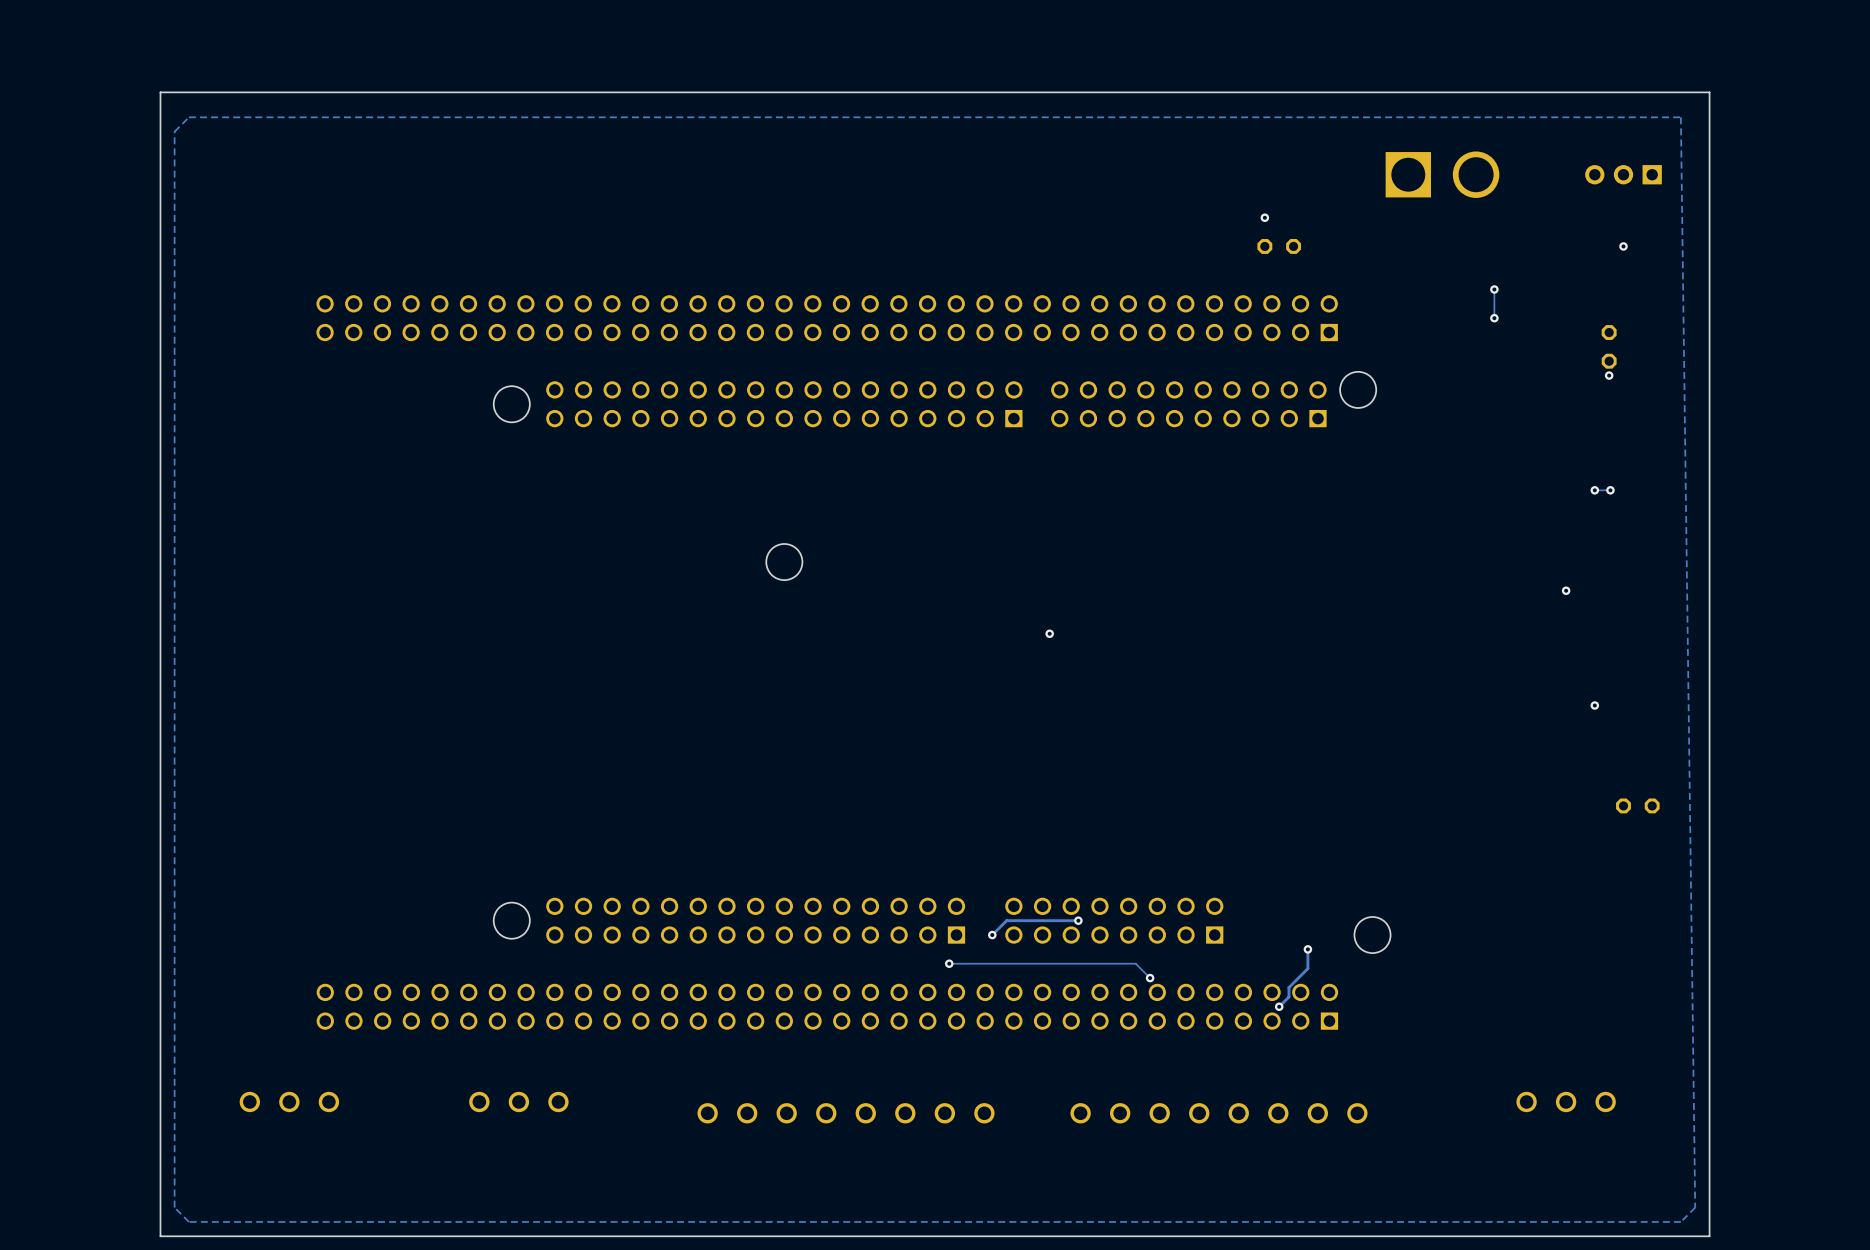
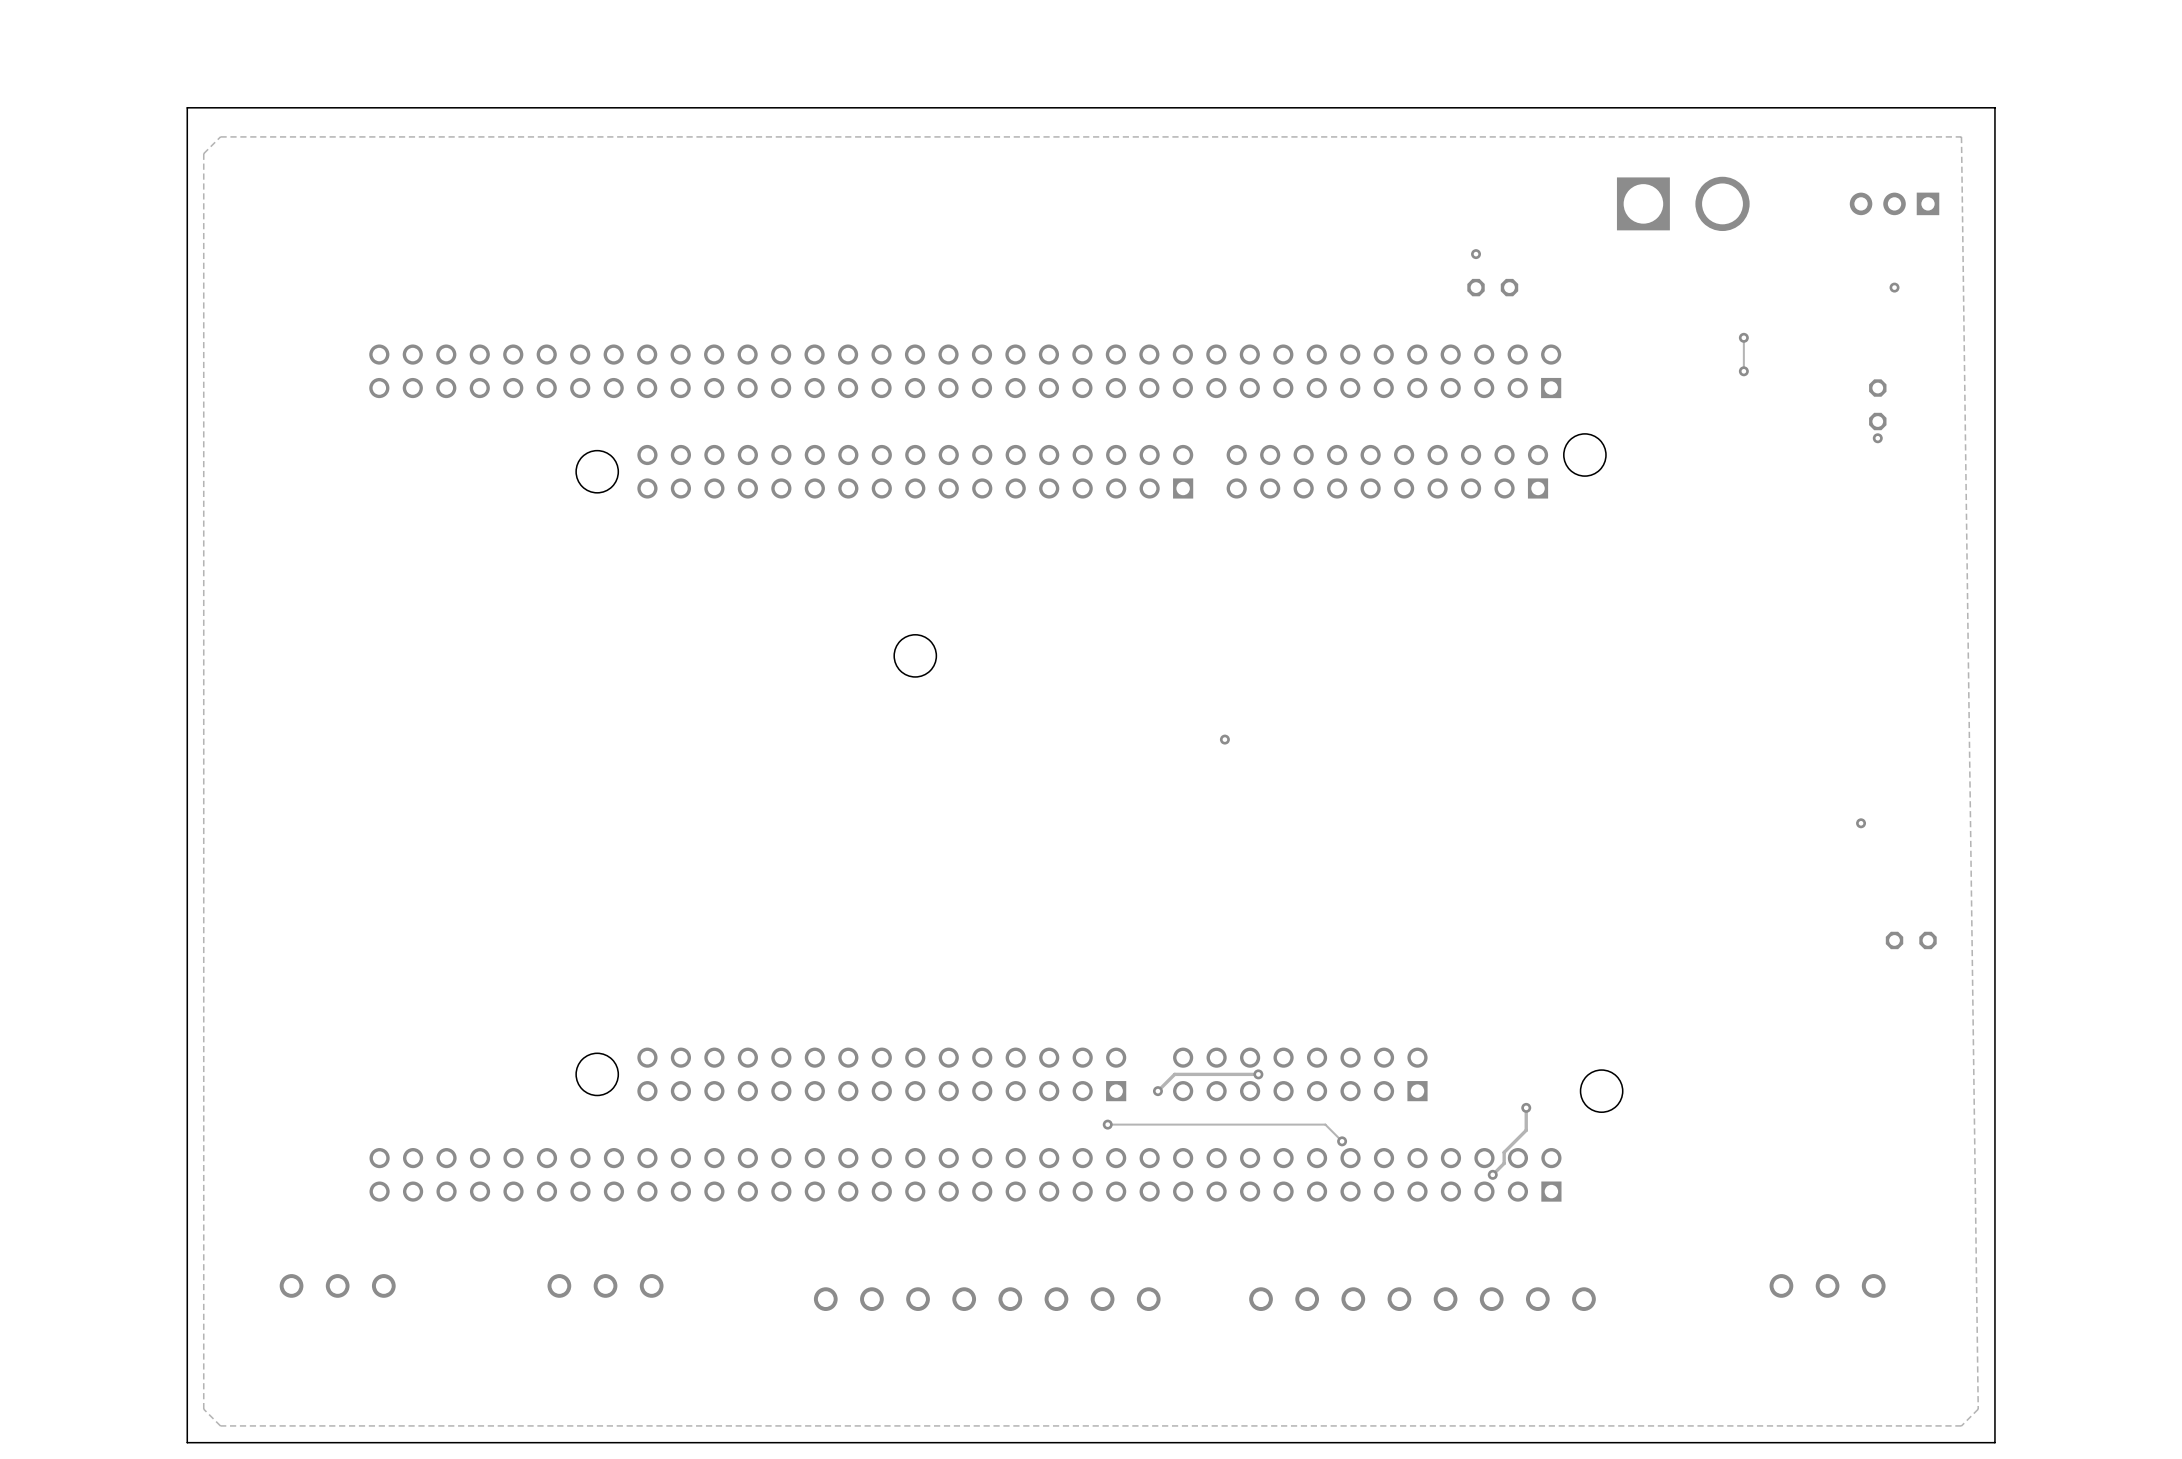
via: (1594, 490) -> none
track: (1610, 490) (1594, 490) -> none
via: (1610, 490) -> none
via: (1566, 590) -> none

